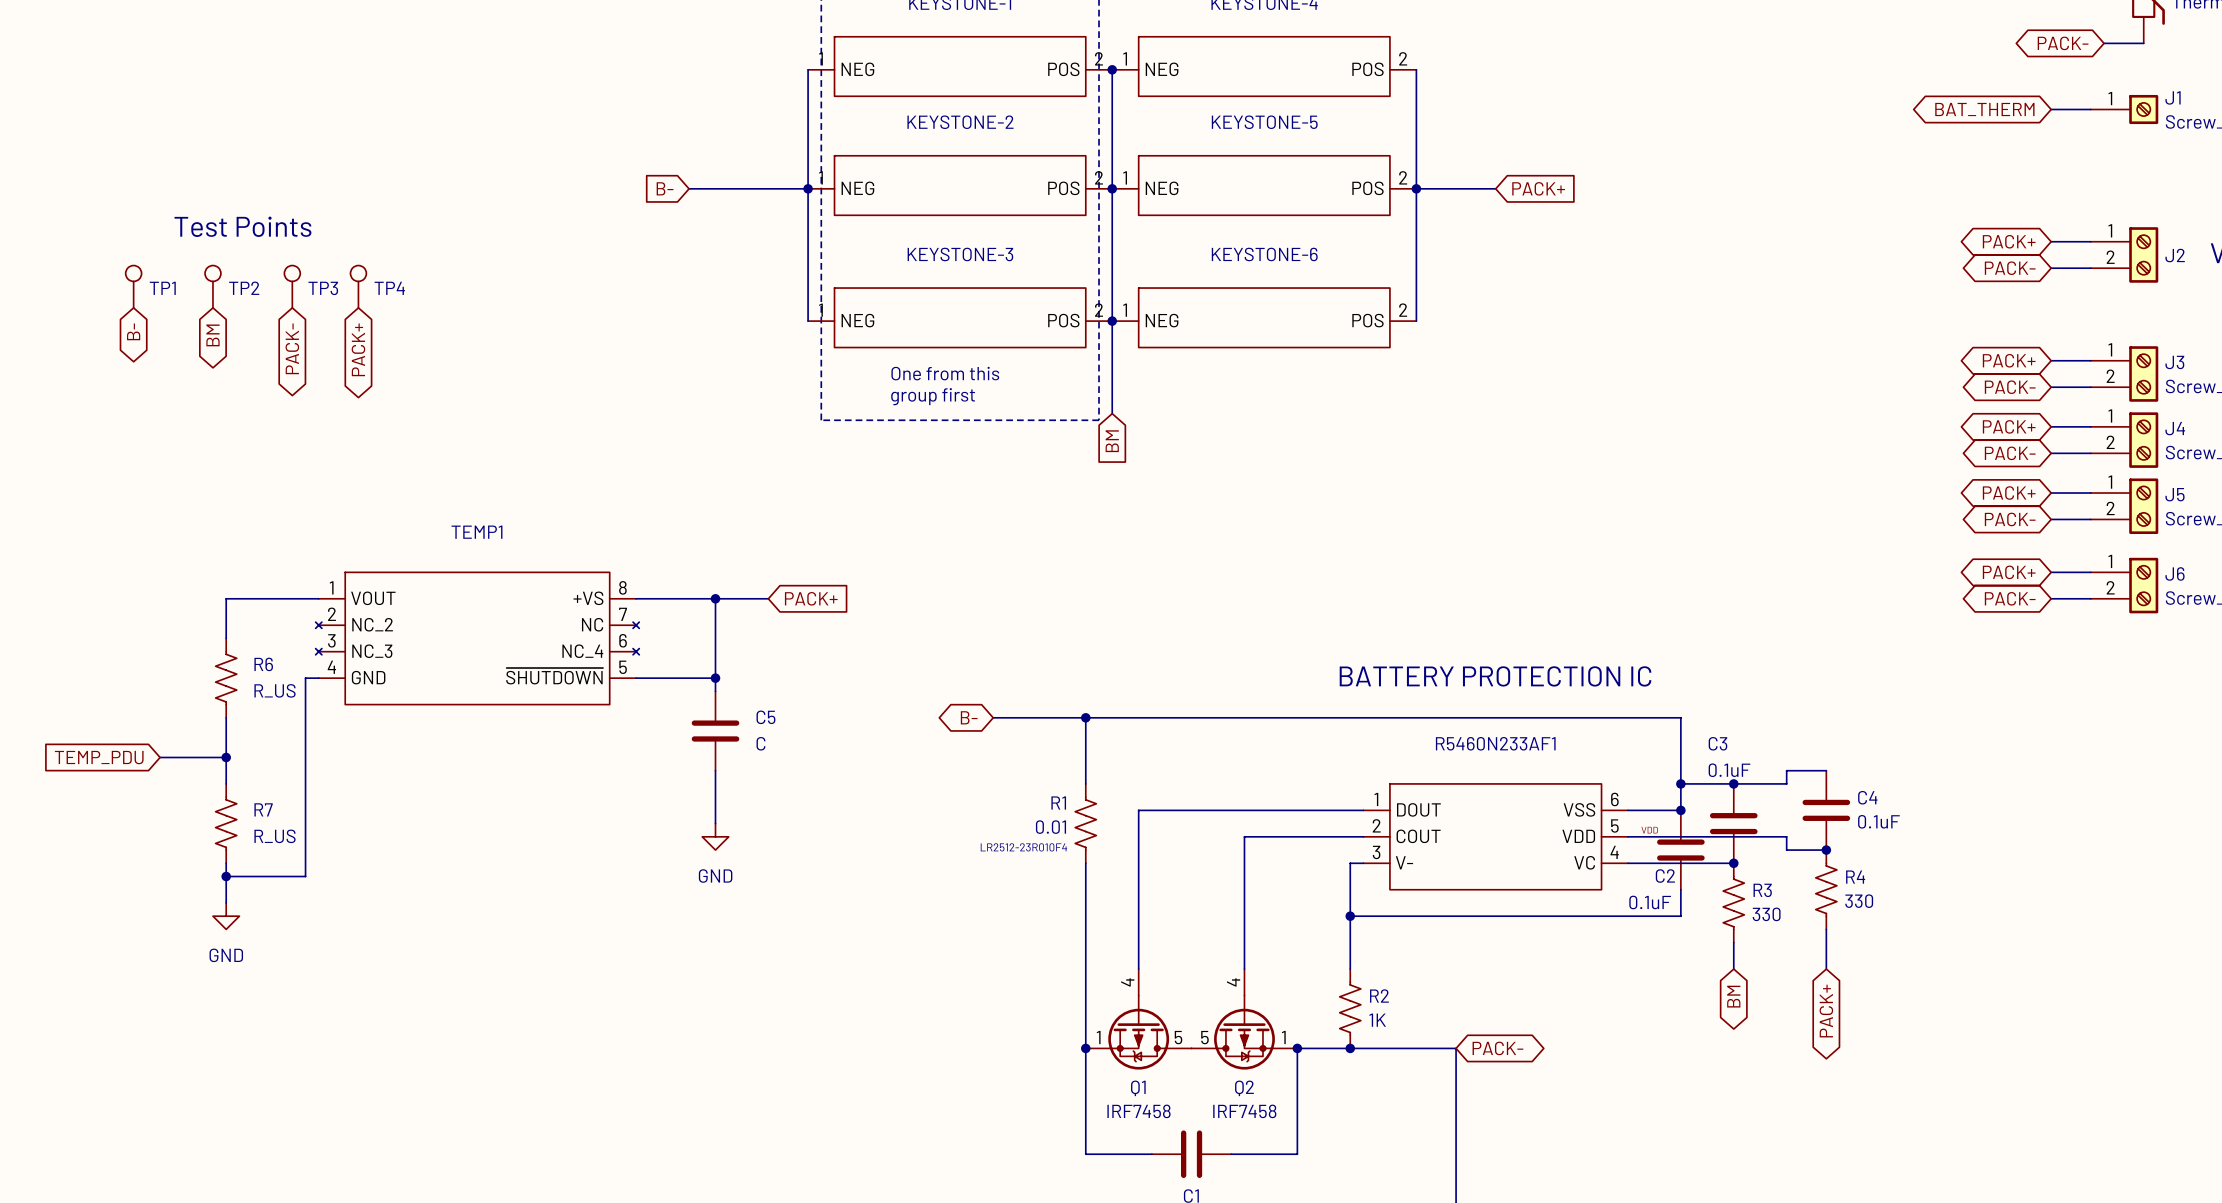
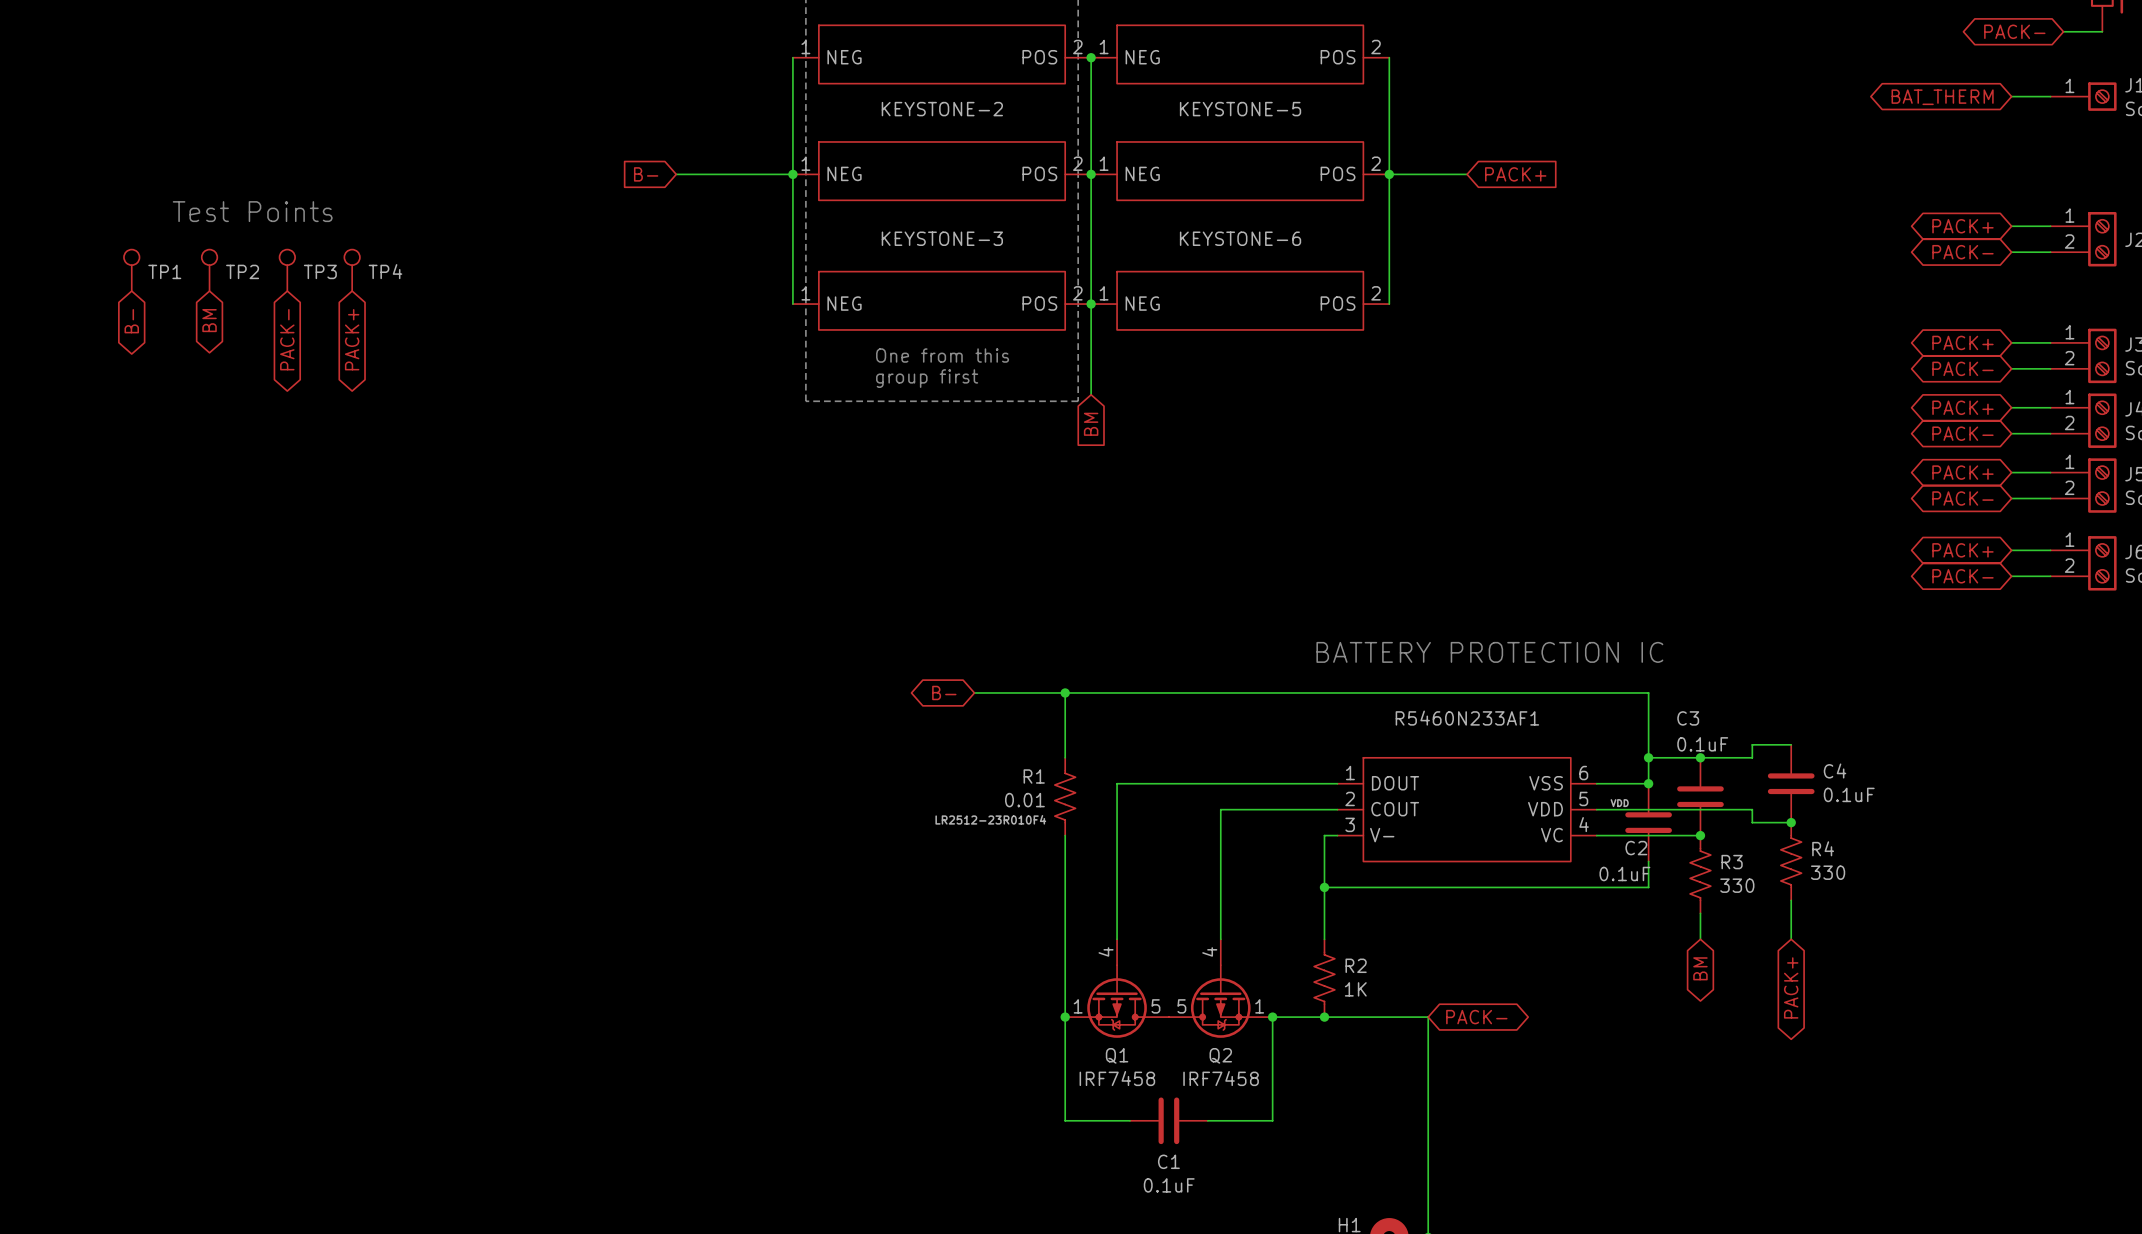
wire: (318, 598) (226, 598) (226, 638) -> none
wire: (636, 598) (768, 598) -> none
wire: (715, 598) (715, 691) -> none
junction: (715, 598) -> none
global label: PACK+ (811, 598) -> none
TEMP1: (477, 638) -> none
R6: R_US (226, 678) -> none
wire: (318, 678) (305, 678) (305, 876) (226, 876) -> none
wire: (636, 678) (715, 678) -> none
junction: (715, 678) -> none
wire: (226, 717) (226, 783) -> none
C5: C (715, 731) -> none
global label: TEMP_PDU (99, 757) -> none
wire: (160, 757) (226, 757) -> none
junction: (226, 757) -> none
wire: (715, 770) (715, 823) -> none
R7: R_US (226, 823) -> none
power symbol: GND (715, 836) -> none
wire: (226, 863) (226, 902) -> none
junction: (226, 876) -> none
power symbol: GND (226, 916) -> none

